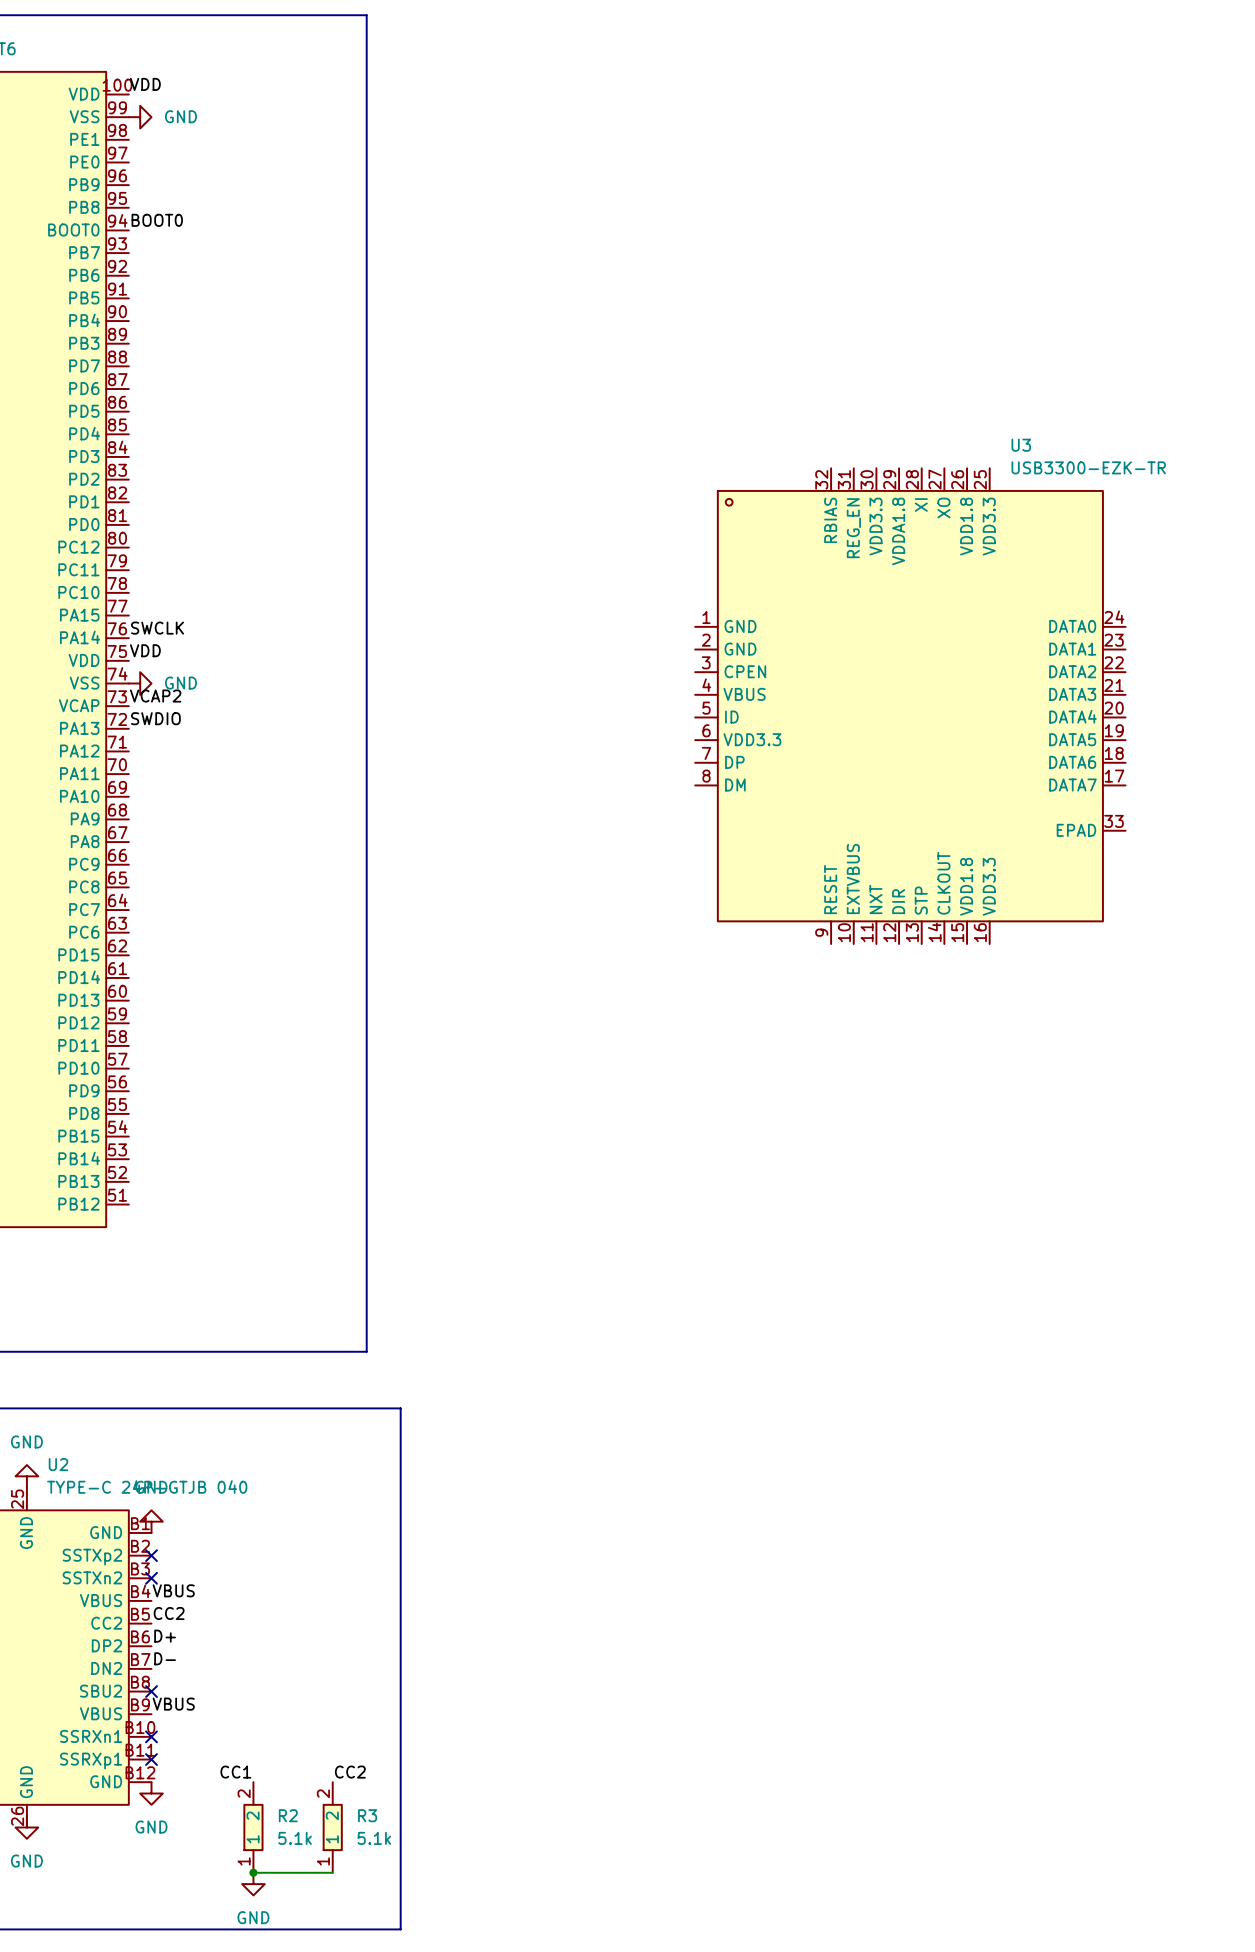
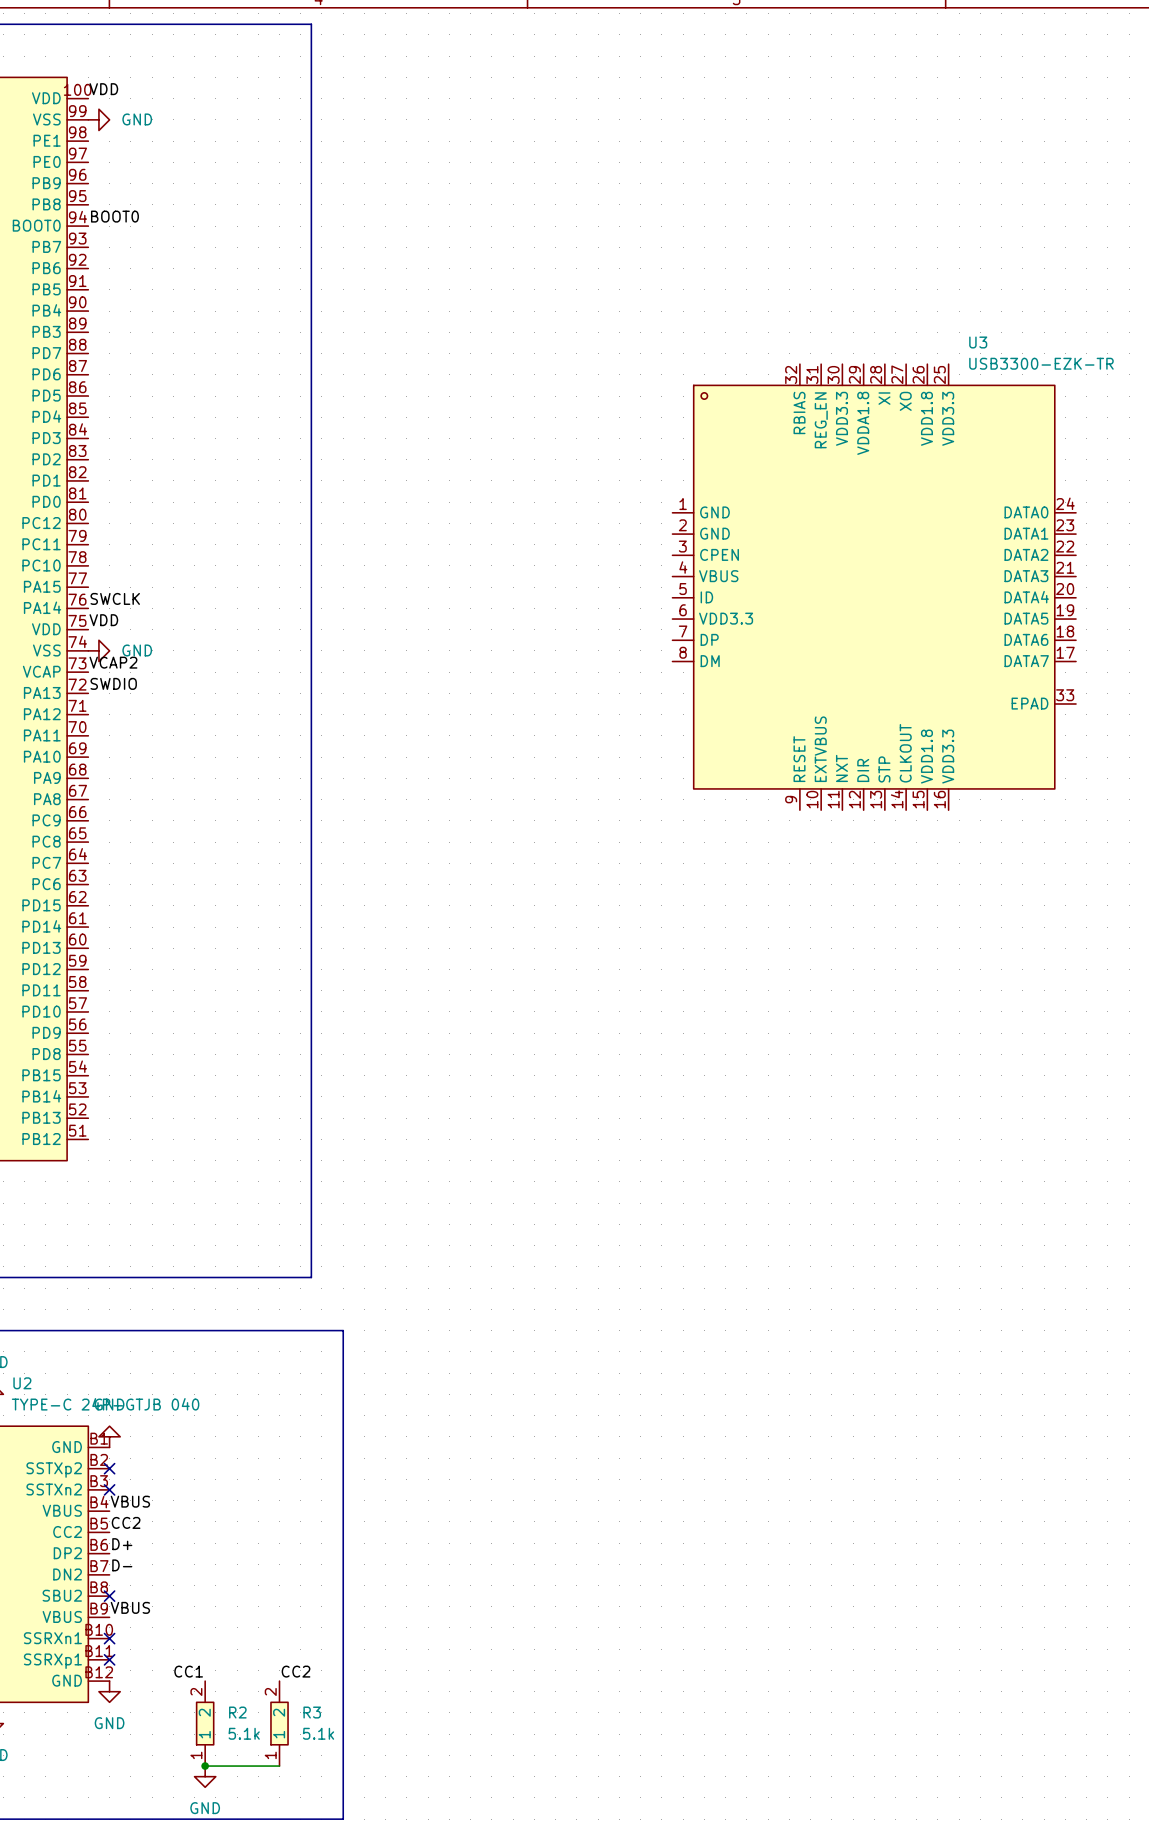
U3 position: (910, 706) -> (874, 587)

